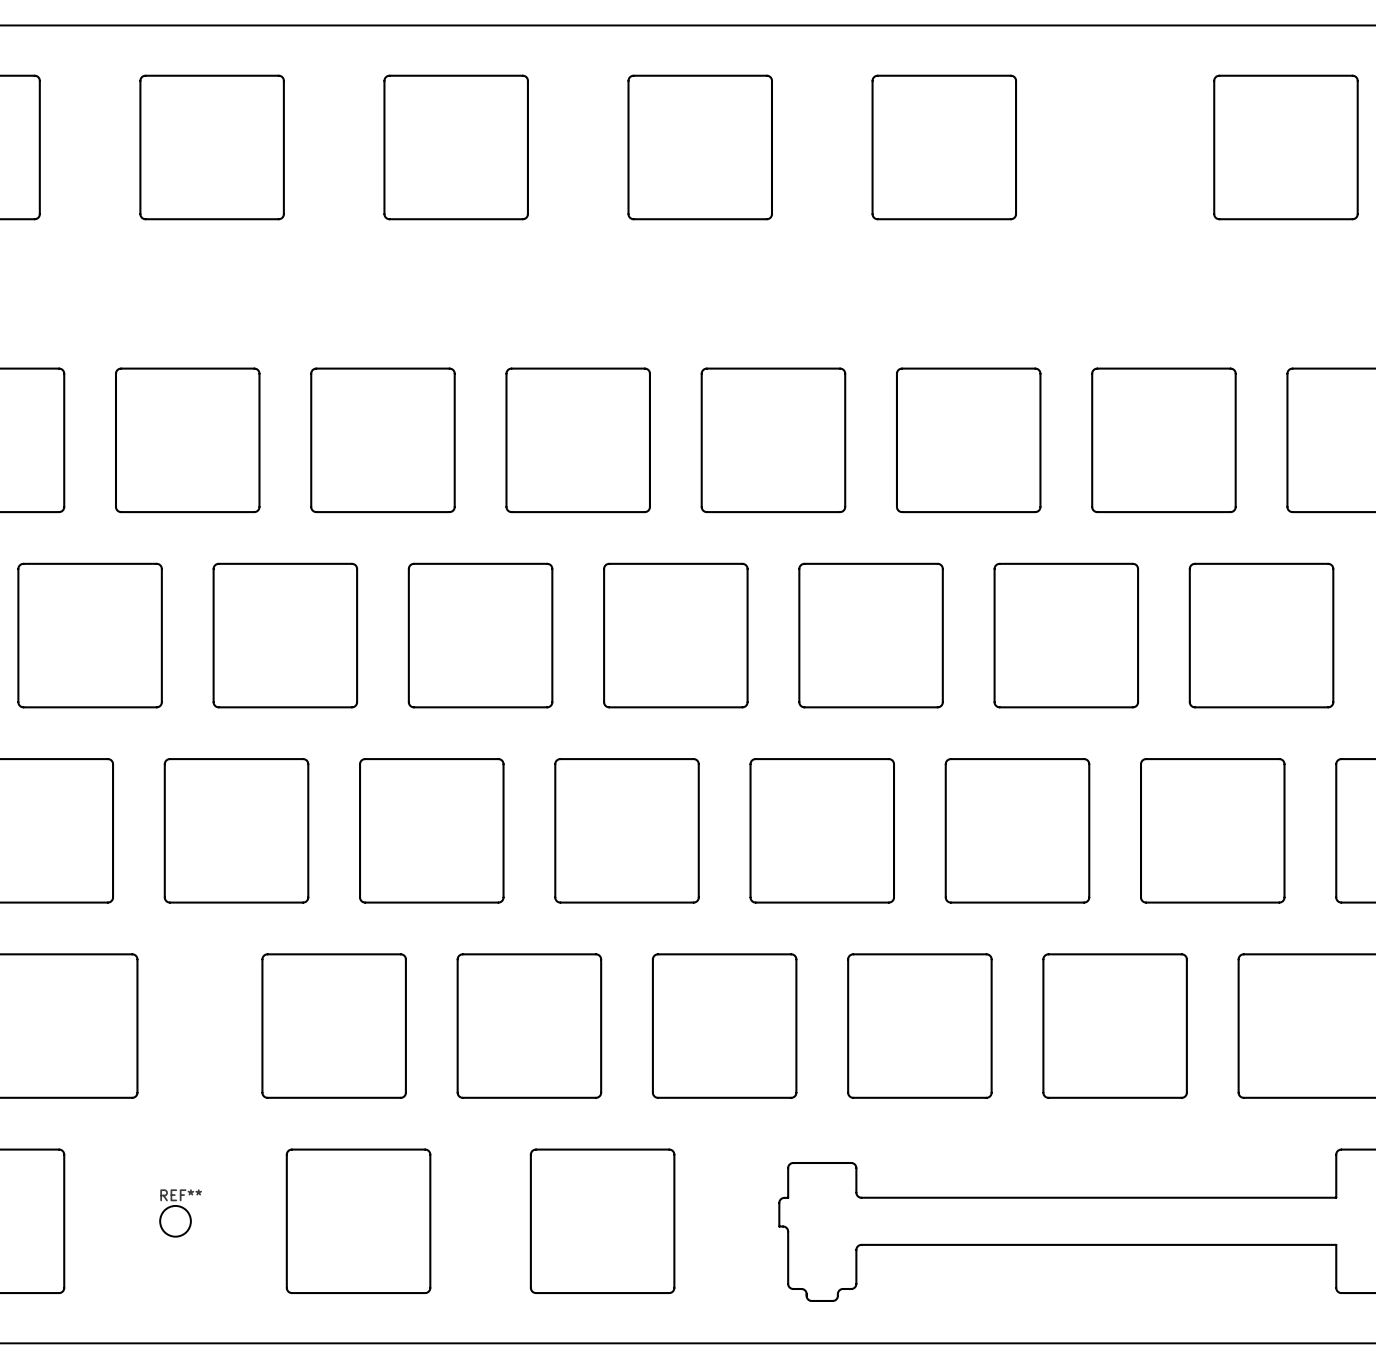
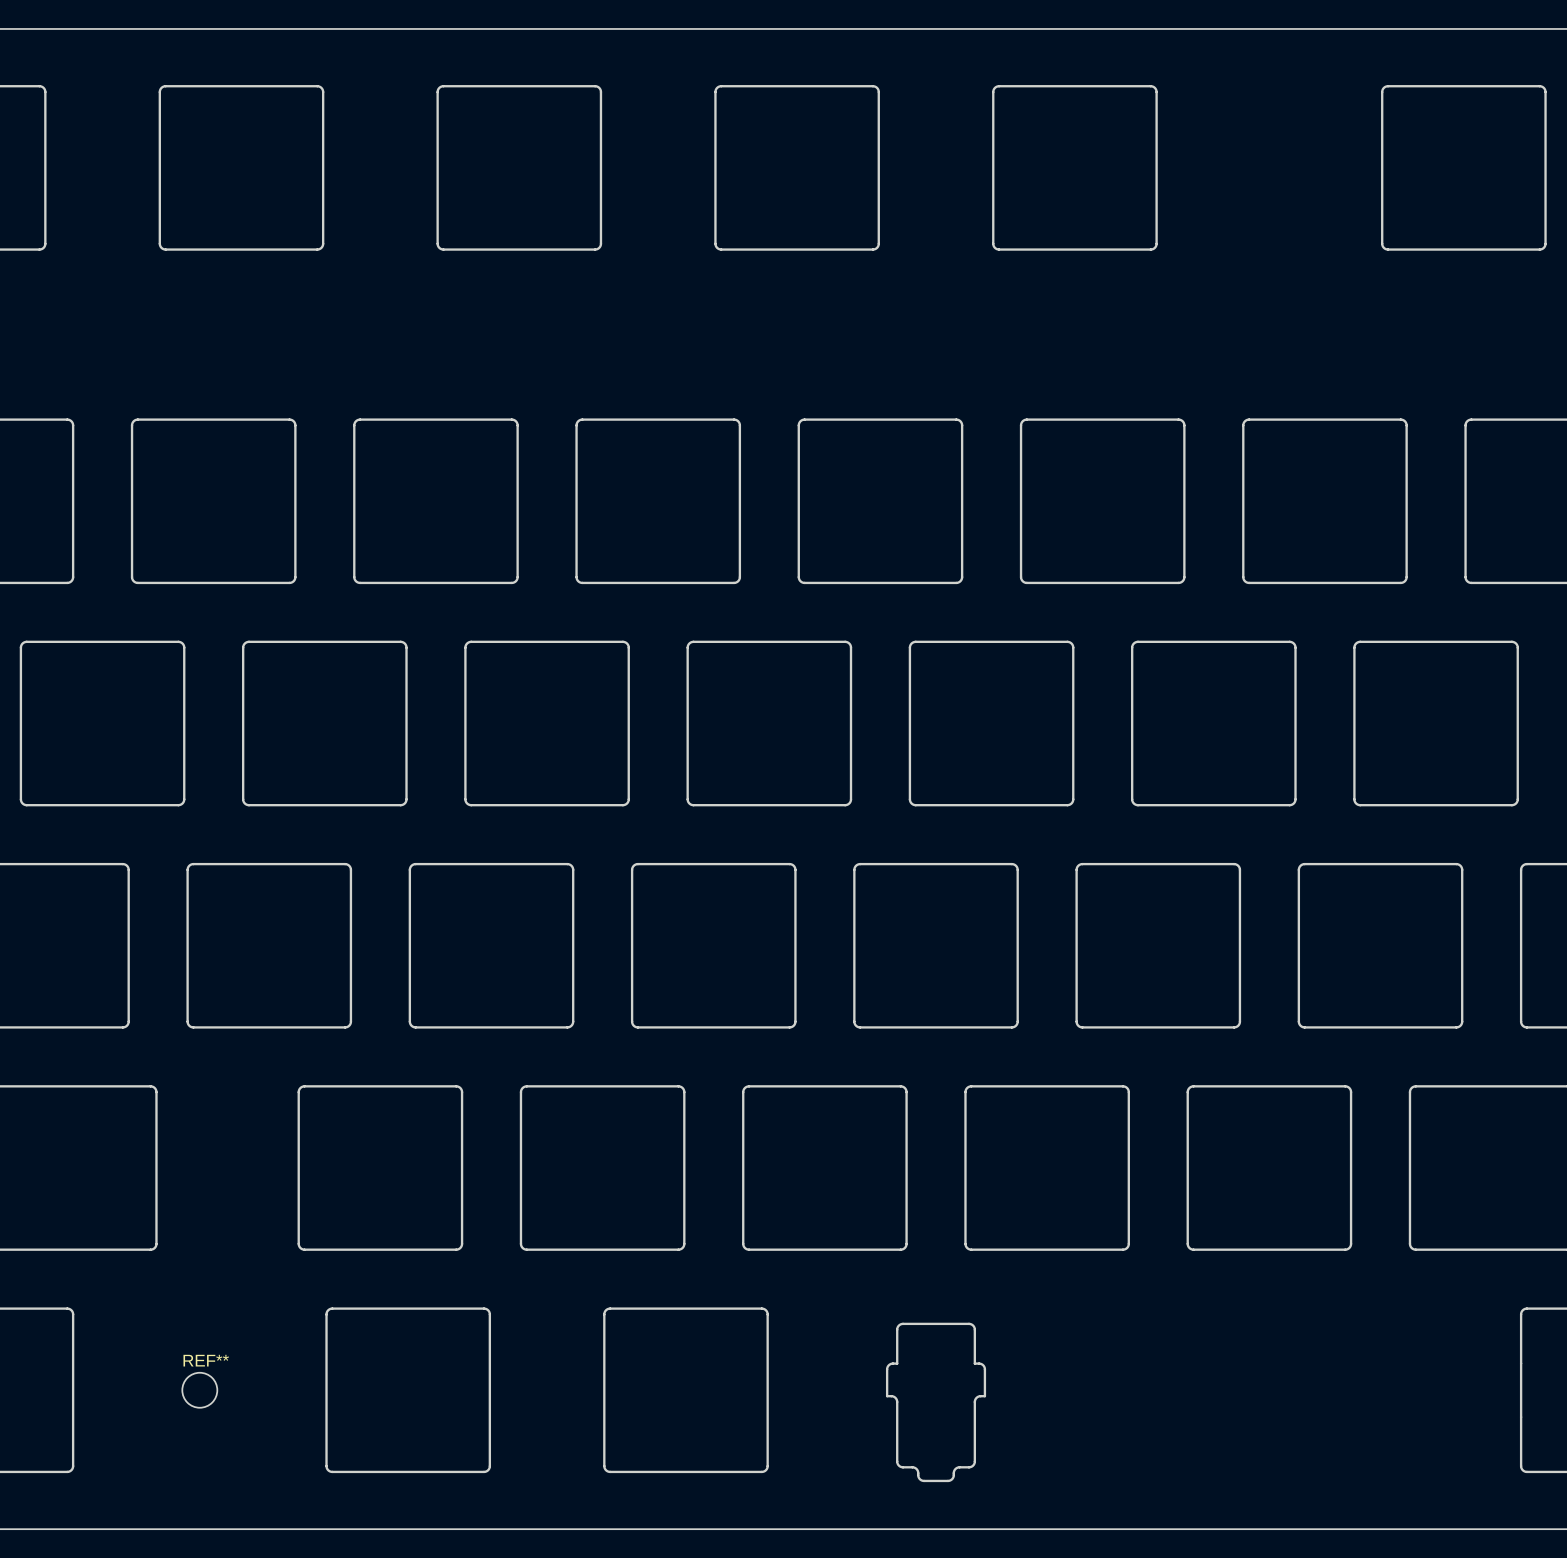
board edge: (856, 1192) (857, 1196) (861, 1197) (1336, 1197) -> (974, 1357) (974, 1363) (982, 1364) (984, 1369) (984, 1396) (978, 1396) (975, 1399) (974, 1422)
board edge: (1336, 1244) (861, 1244) (857, 1246) (856, 1250) -> (1521, 1417) (1521, 1363)

